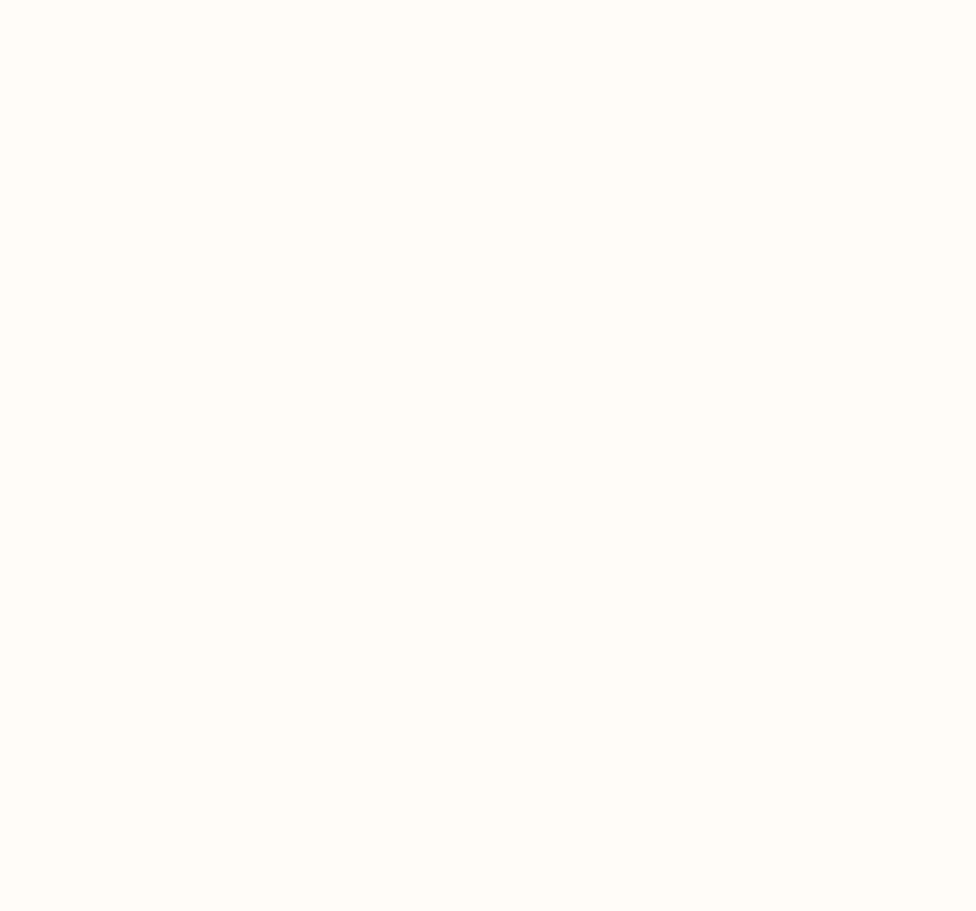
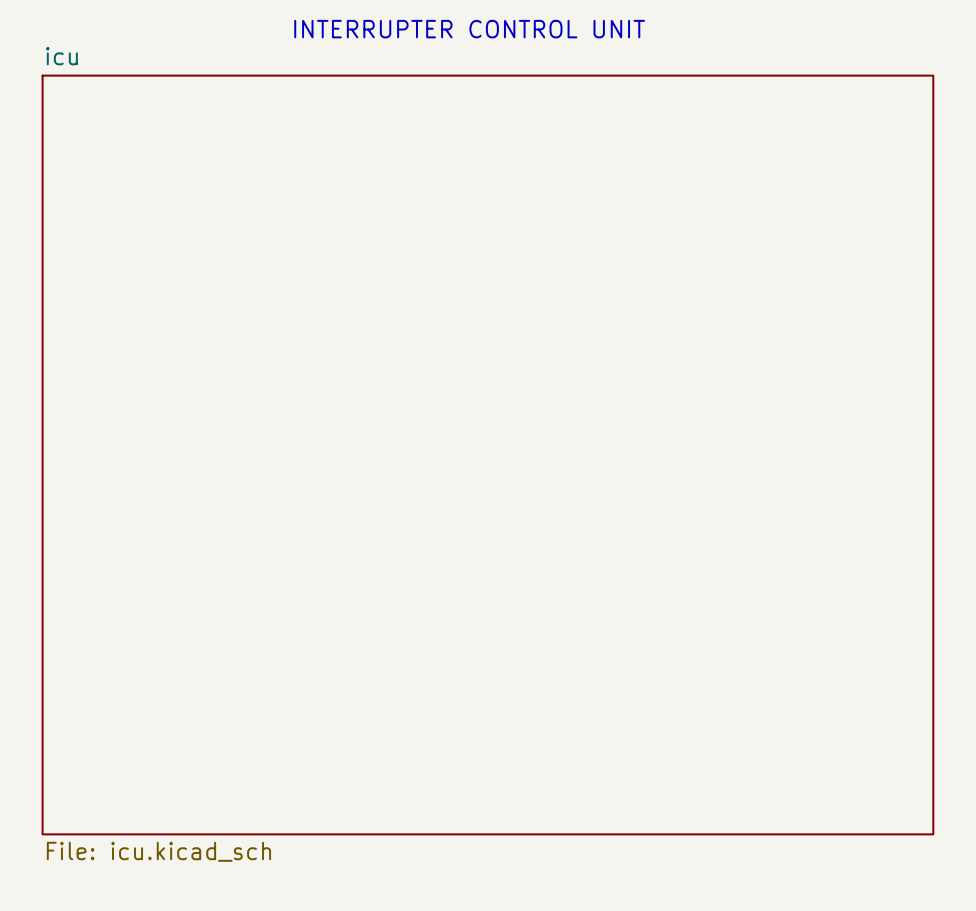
text: none -> INTERRUPTER CONTROL UNIT (469, 29)
sheet icu: none -> File: icu.kicad_sch (487, 454)

